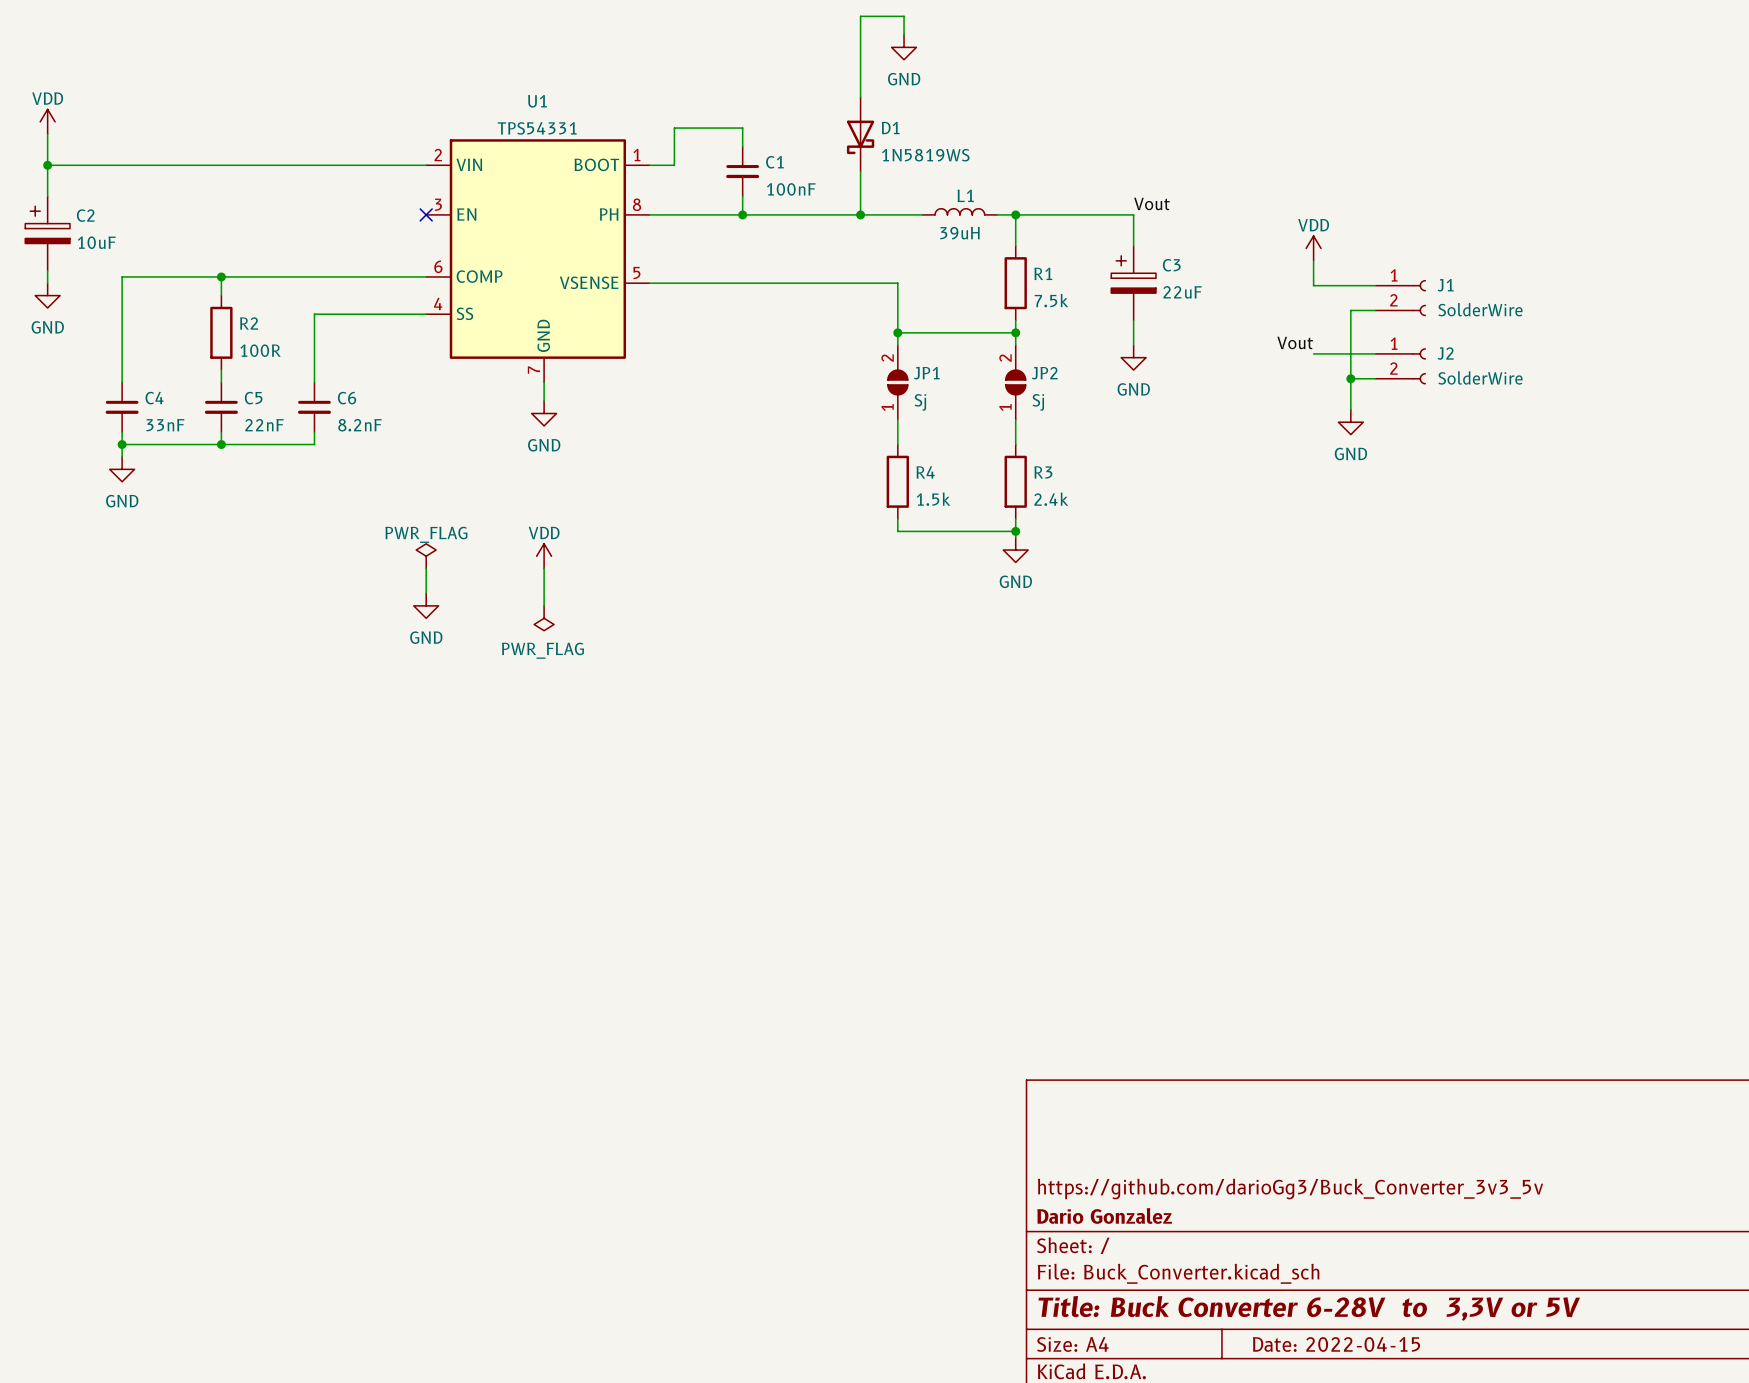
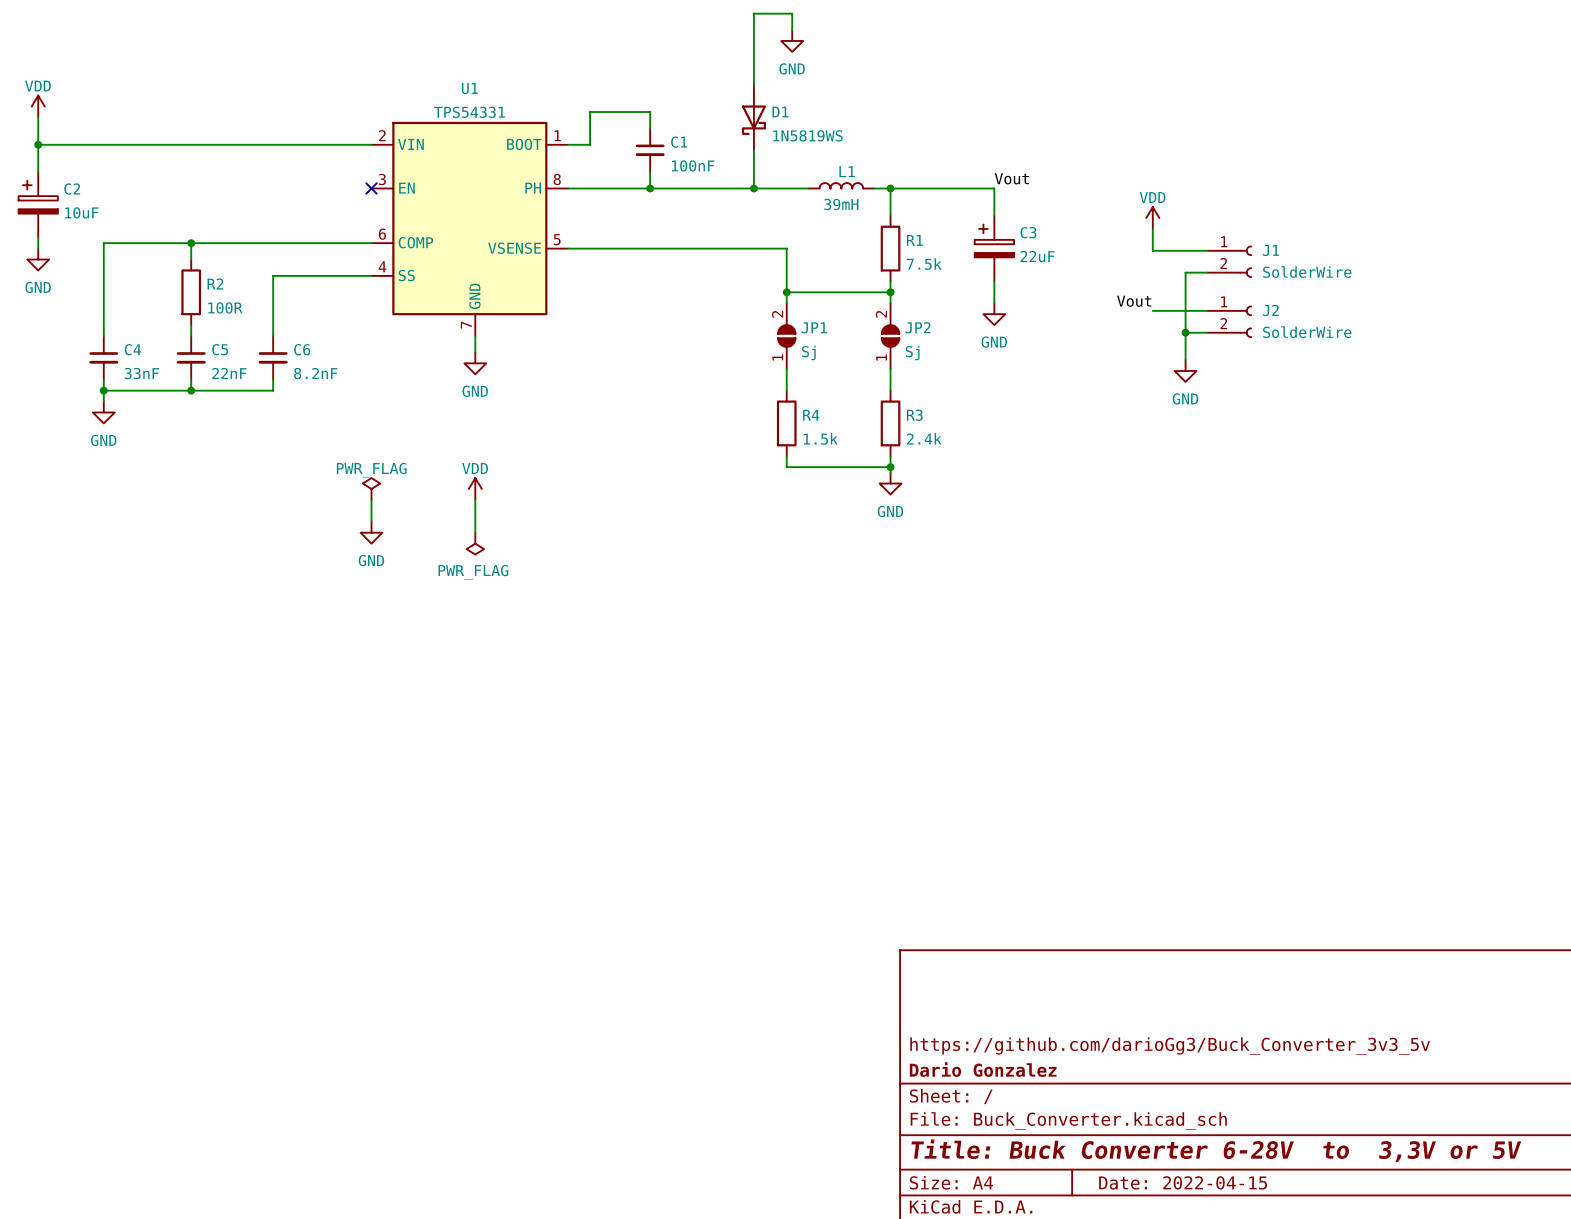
L1 value: 39uH (959, 233) -> 39mH (841, 204)

